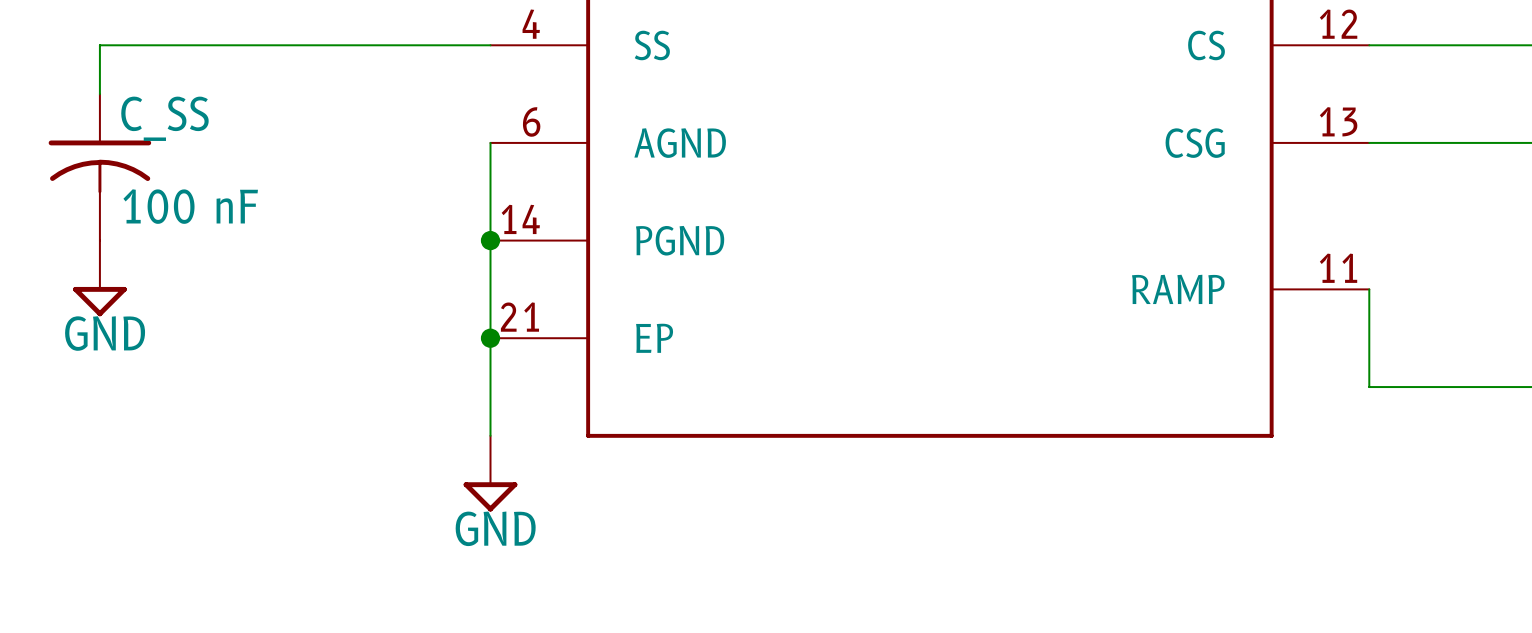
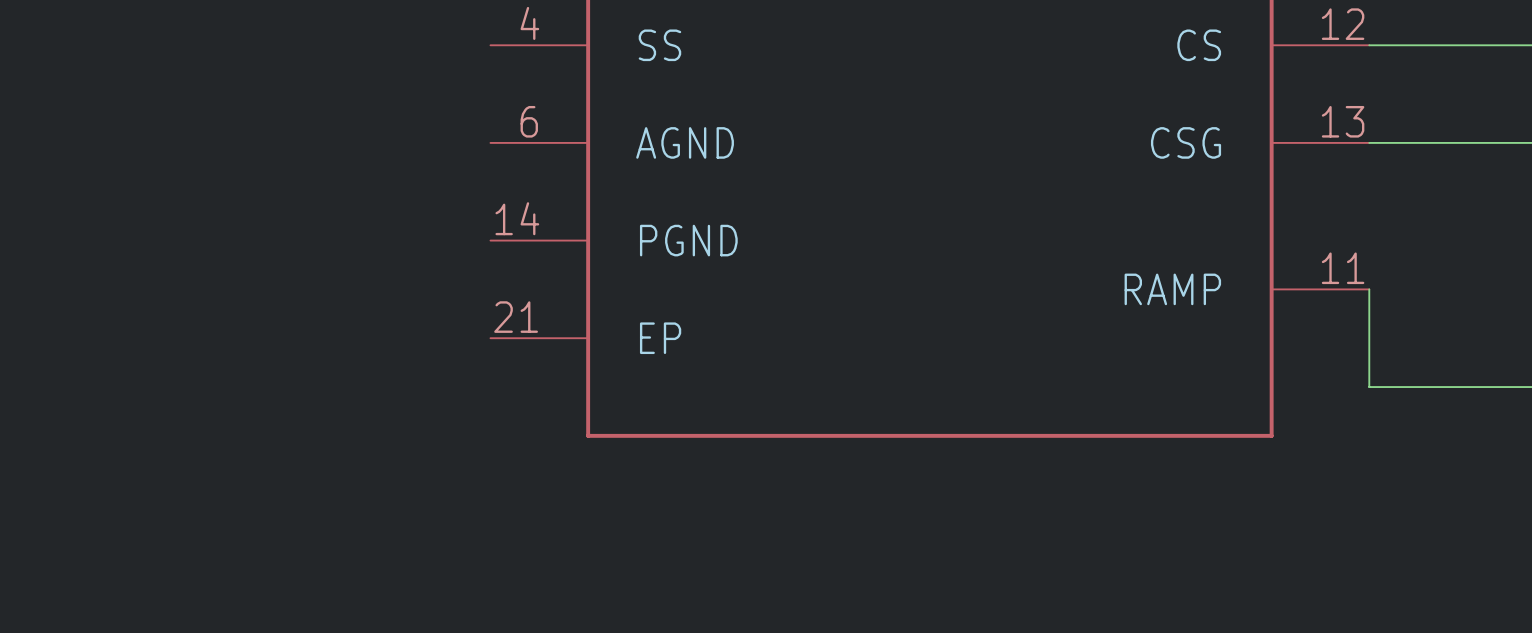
wire: (490, 45) (99, 45) (99, 94) -> none
wire: (490, 142) (490, 435) -> none
C_SS: 100 nF (99, 167) -> none
junction: (490, 240) -> none
power symbol: GND (99, 278) -> none
junction: (490, 338) -> none
power symbol: GND (490, 473) -> none

